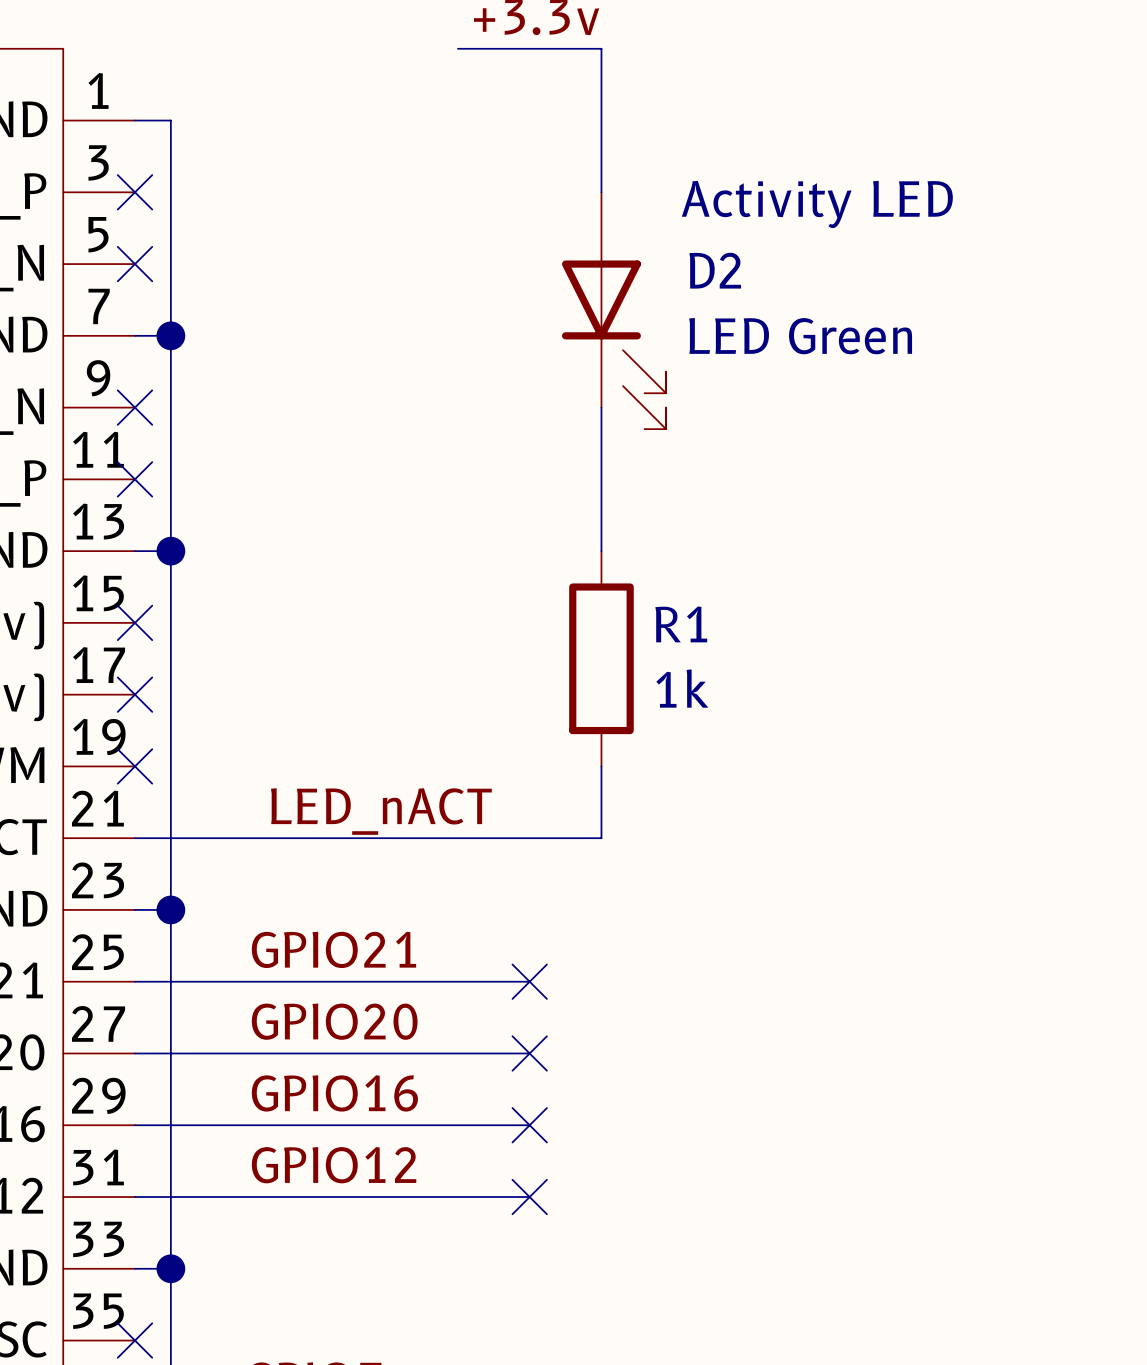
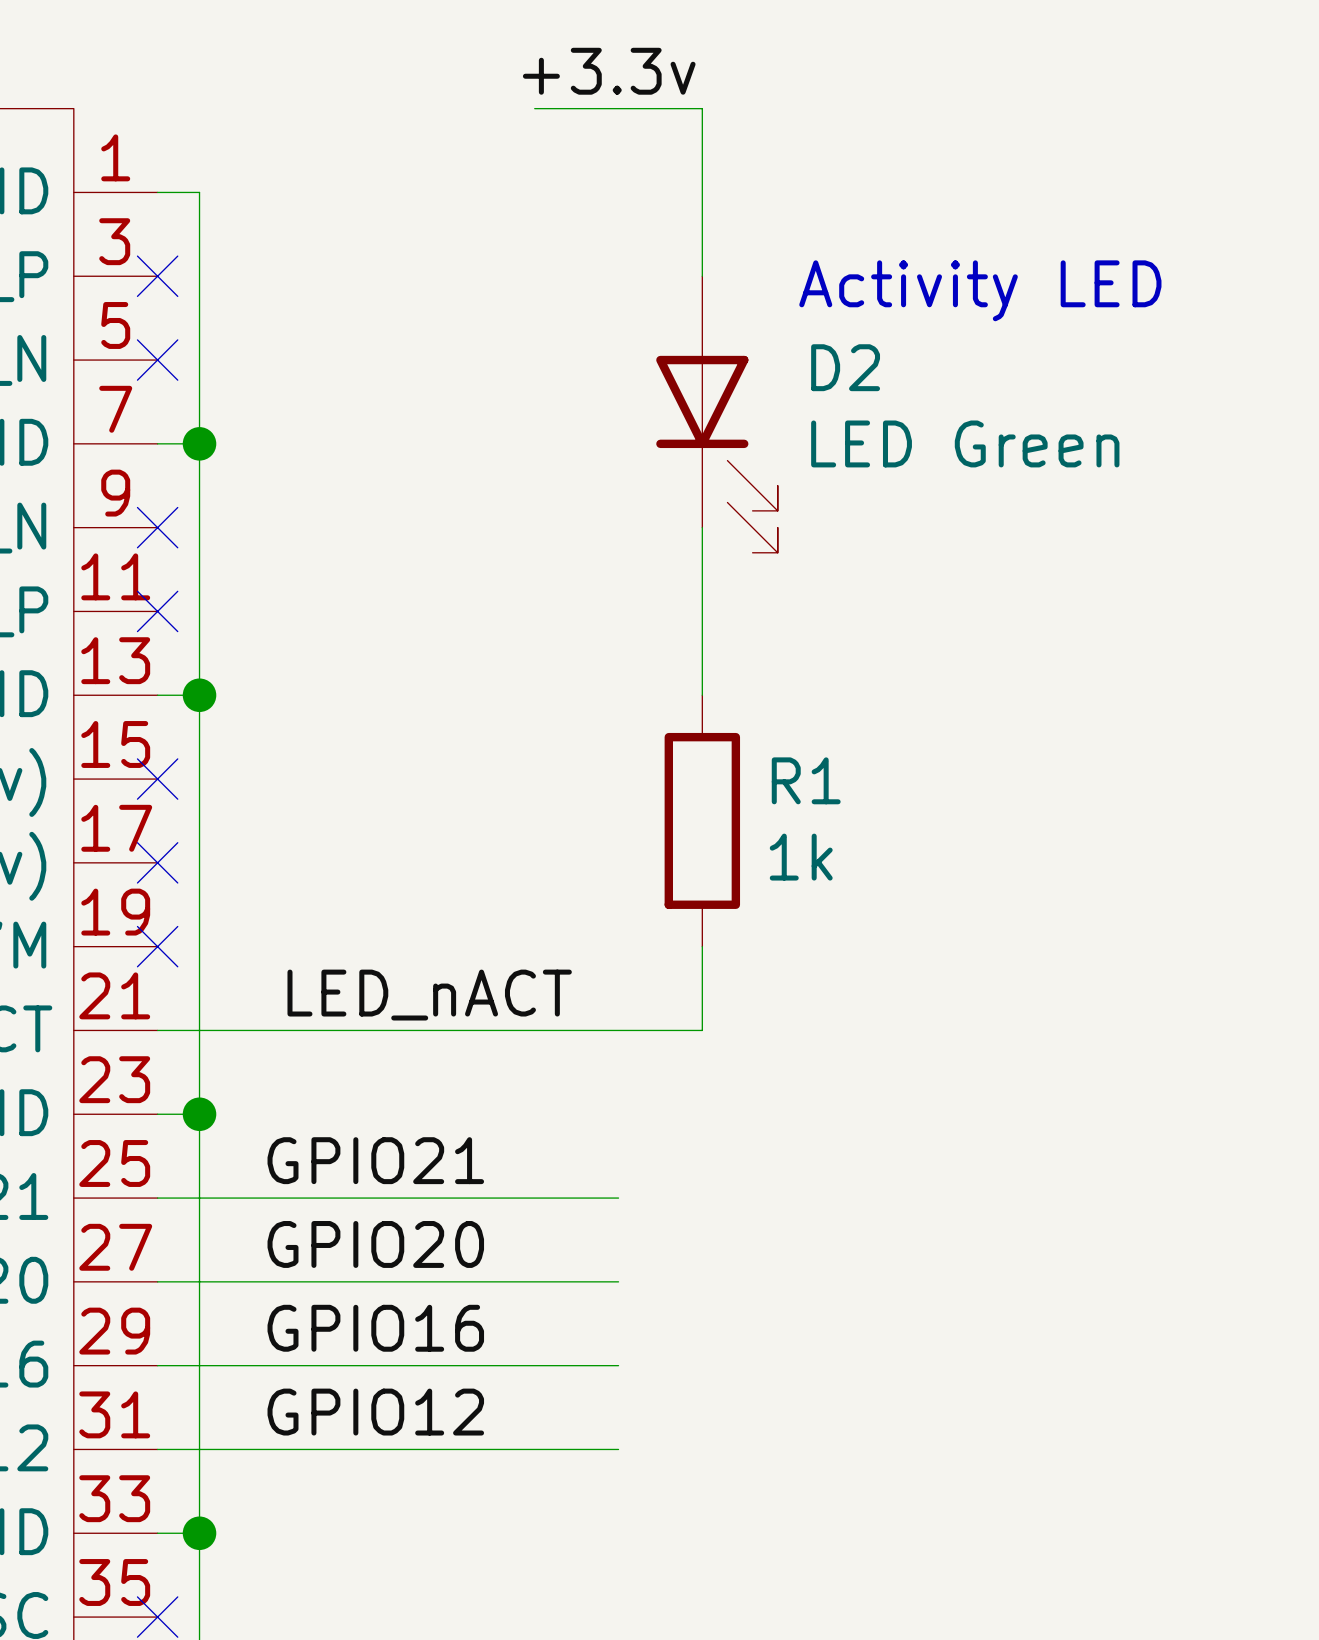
no-connect mark: (529, 981) -> none
no-connect mark: (529, 1053) -> none
no-connect mark: (529, 1125) -> none
no-connect mark: (529, 1197) -> none

